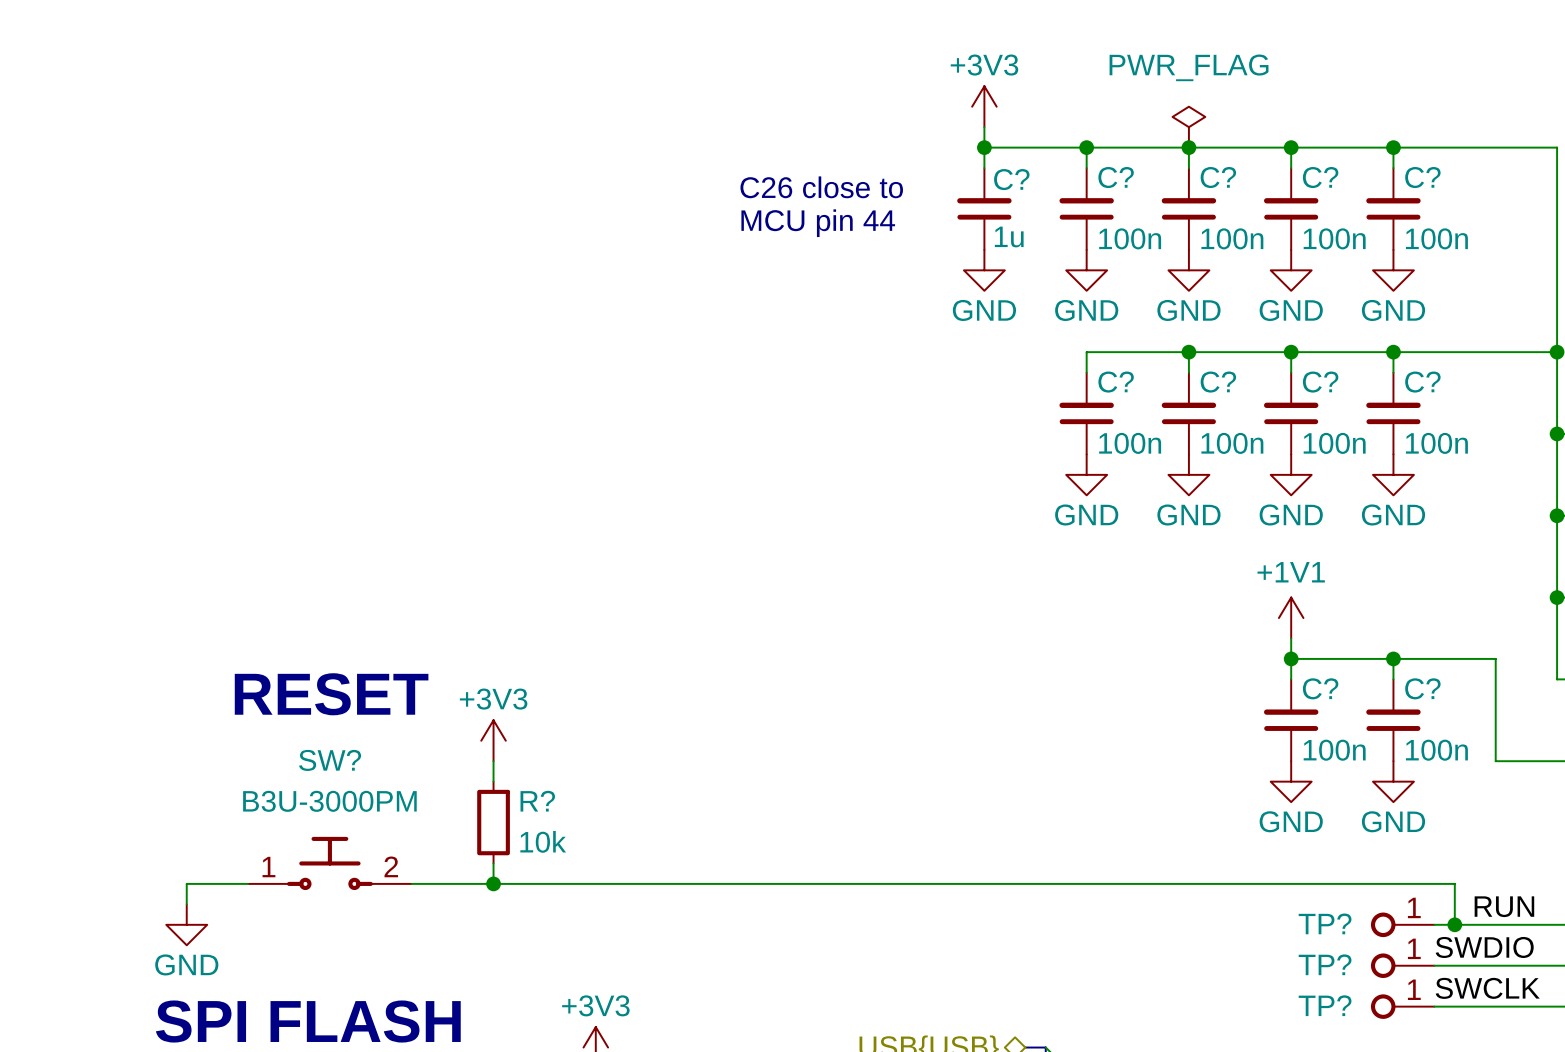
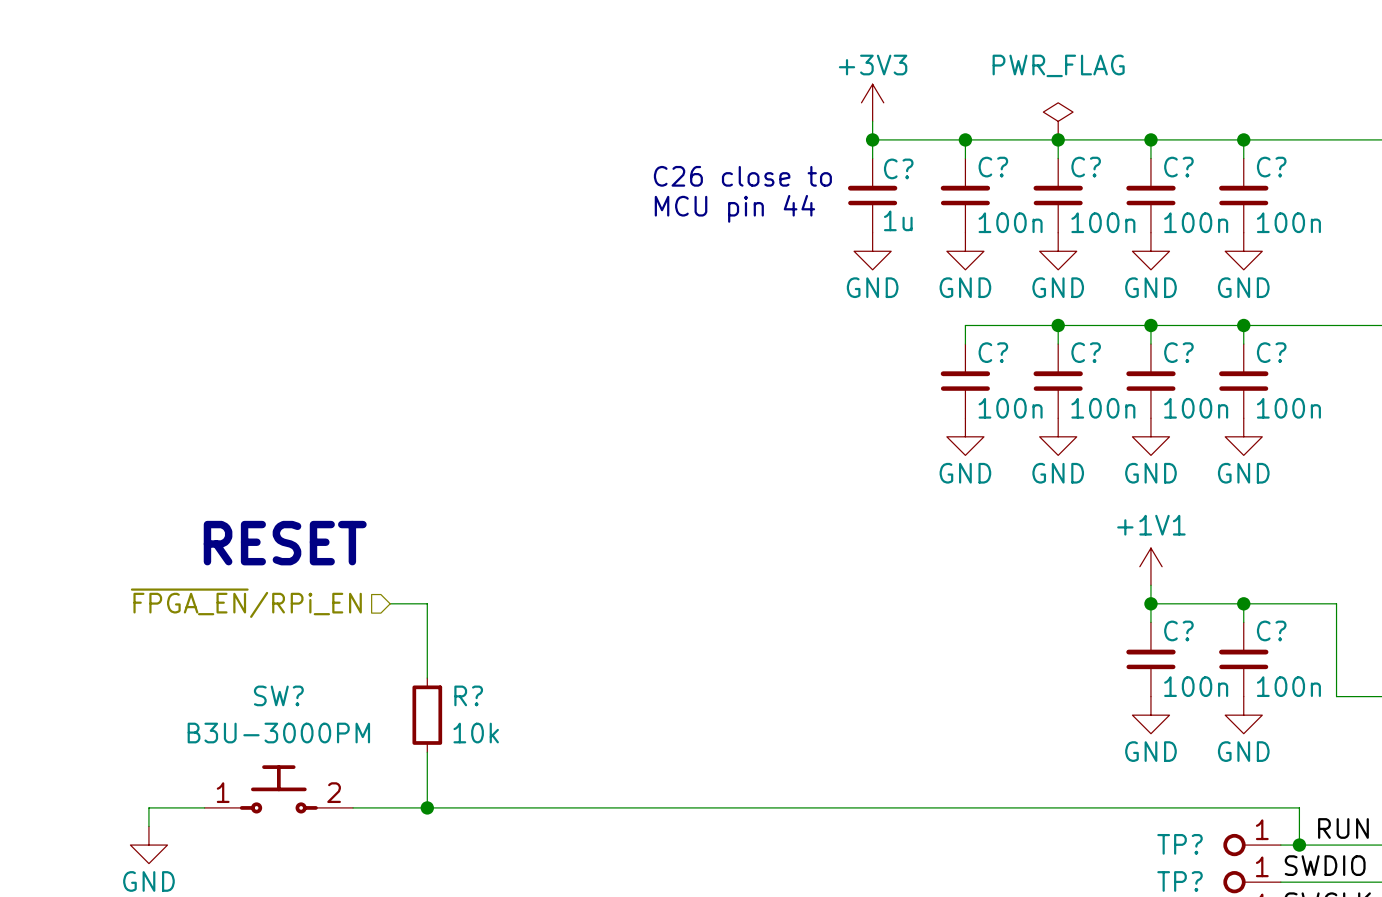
hierarchical label: none -> ~{FPGA_EN}/RPi_EN (246, 603)
wire: none -> (390, 603) (427, 603) (427, 678)
text position: RESET (331, 694) -> RESET (285, 543)
power symbol: +3V3 (493, 740) -> none
wire: (493, 761) (493, 781) -> none
wire: none -> (427, 752) (427, 789)
R? position: (493, 822) -> (427, 715)

